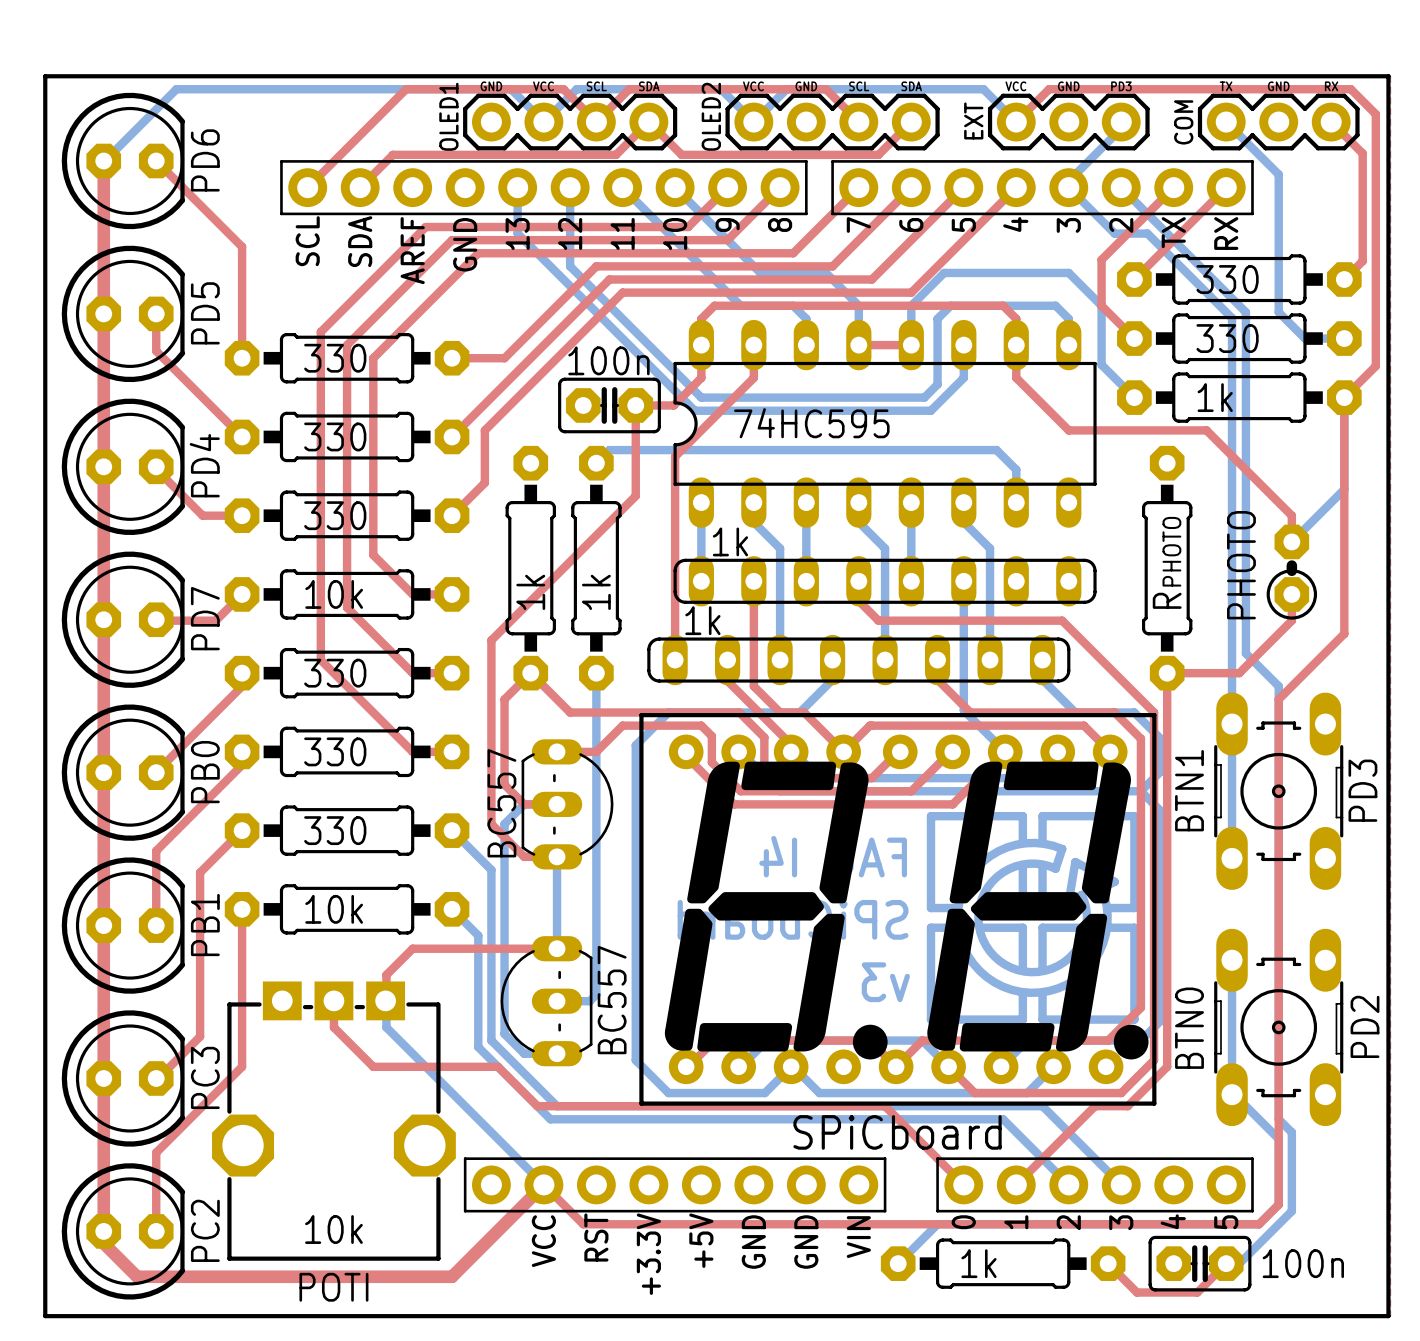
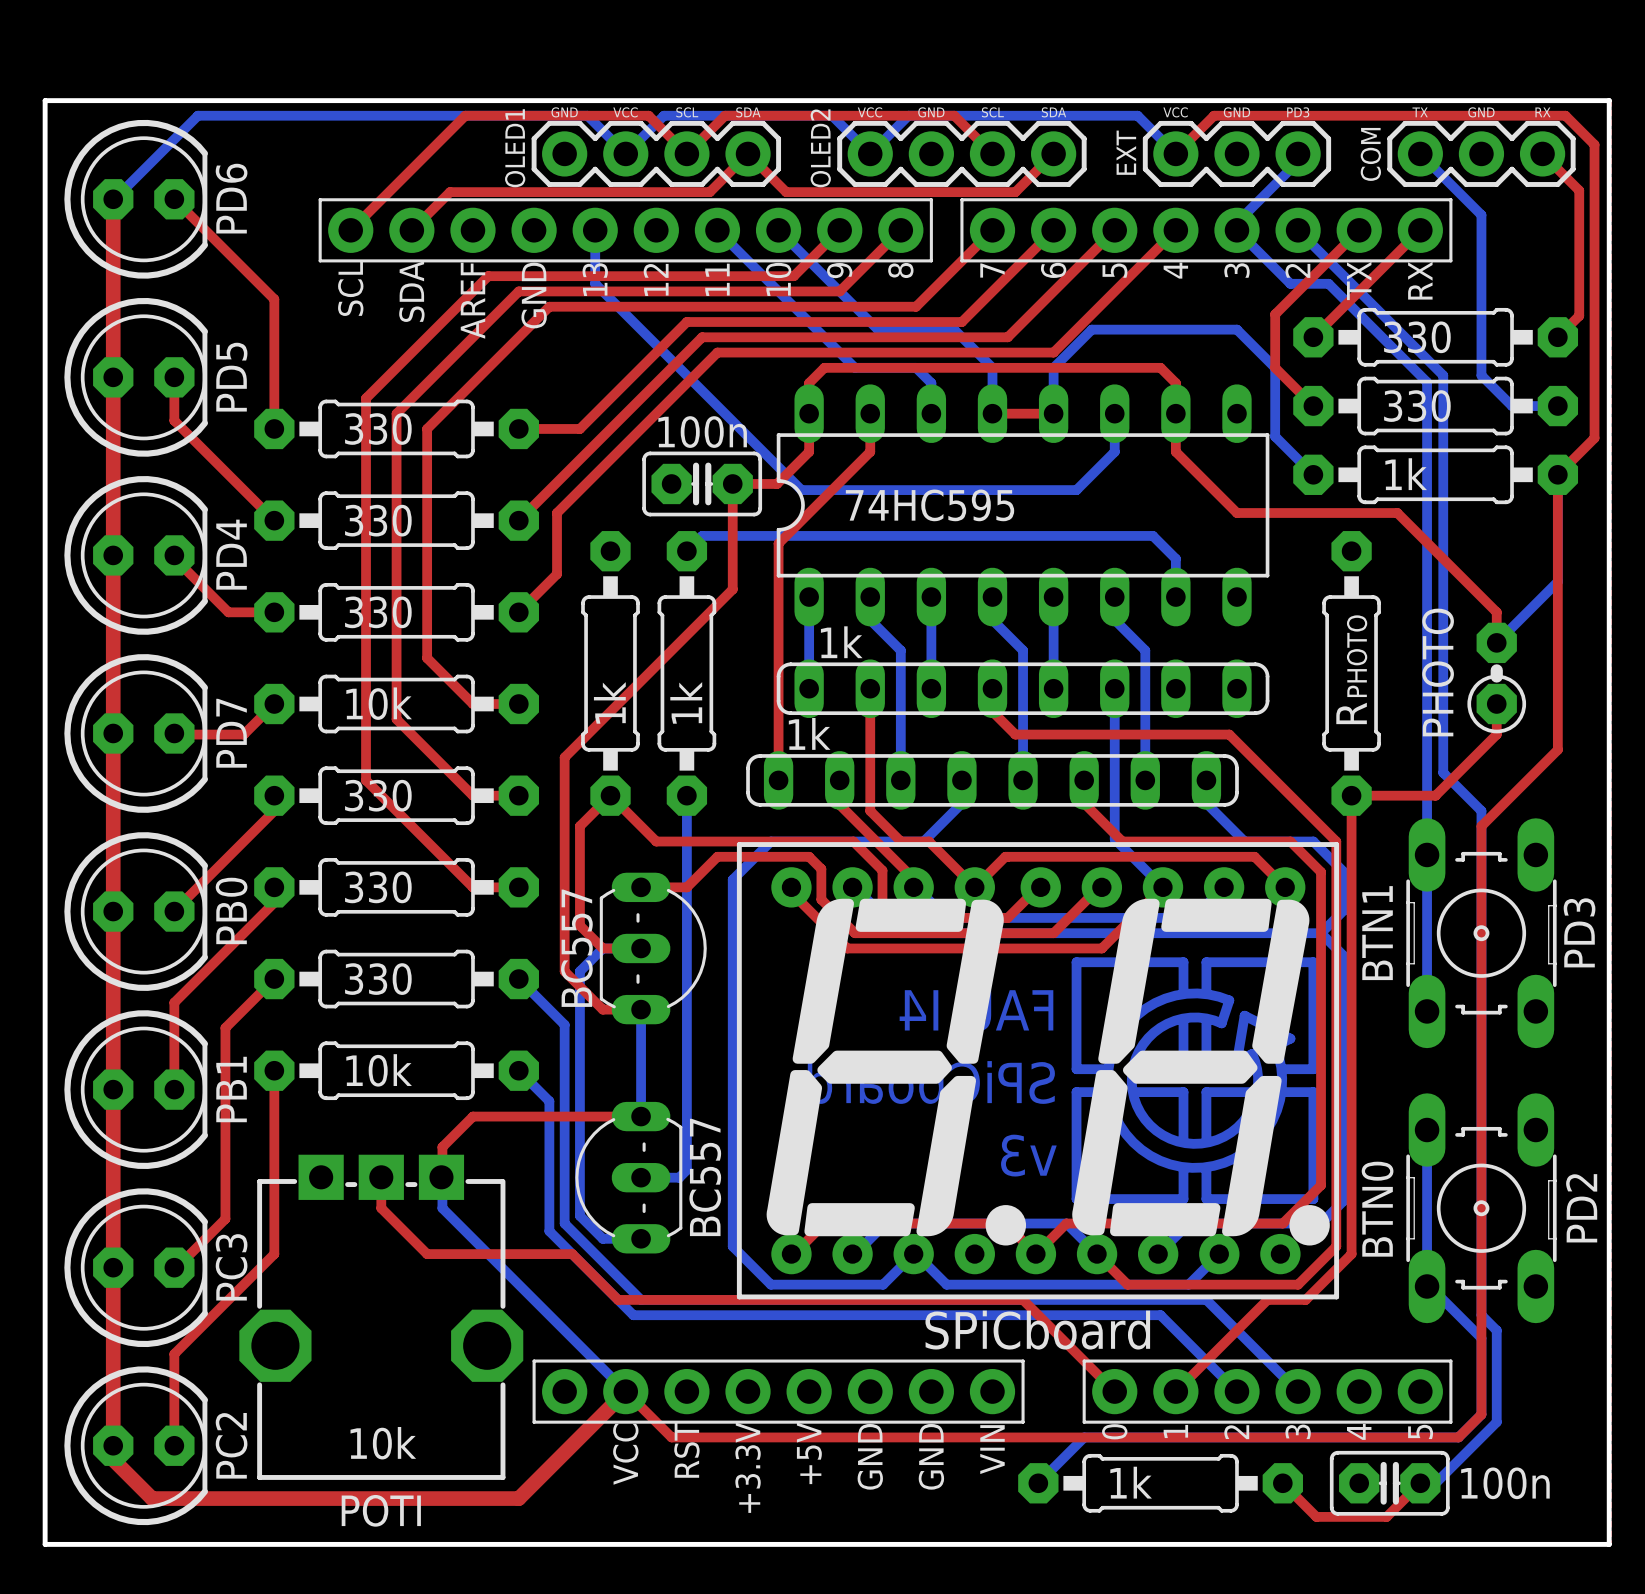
bottom track: (570, 187) (570, 266) (701, 397) (924, 397) (937, 384) (937, 318) (950, 305) (1055, 305) (1068, 318) (1068, 345) -> none

